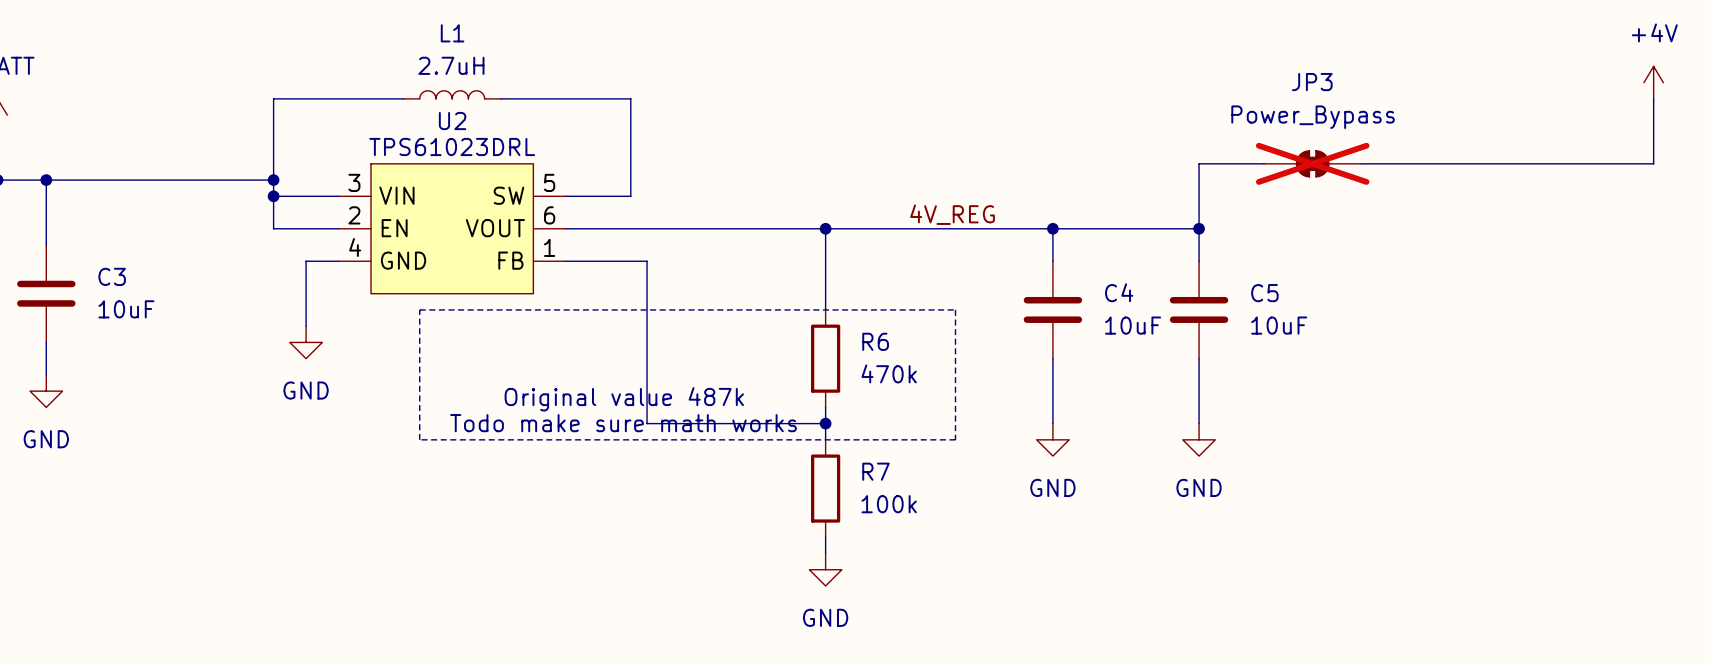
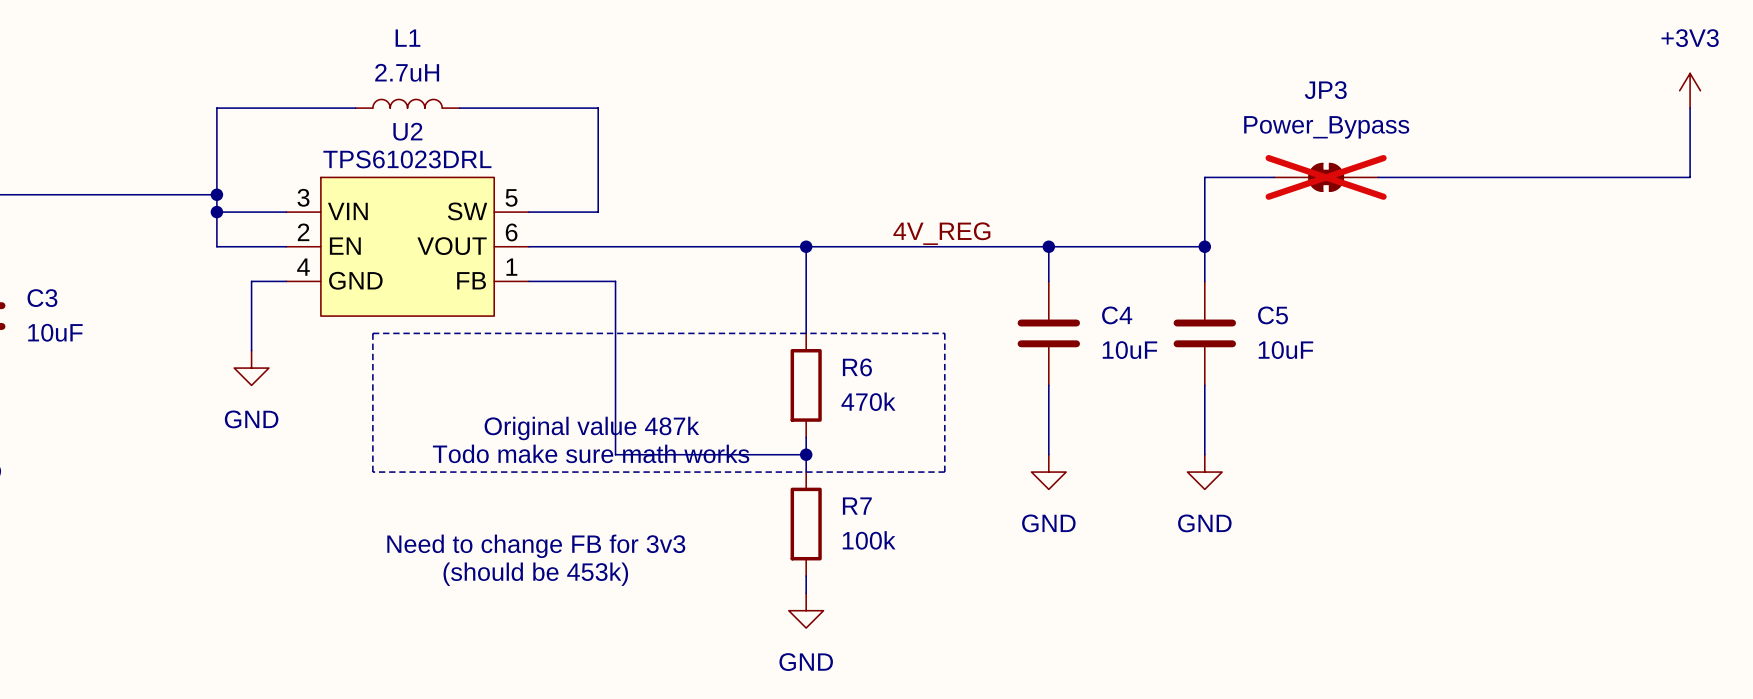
power symbol: +4V (1653, 82) -> +3V3 (1690, 90)
text: none -> Need to change FB for 3v3 (536, 546)
text: none -> (should be 453k) (535, 574)

